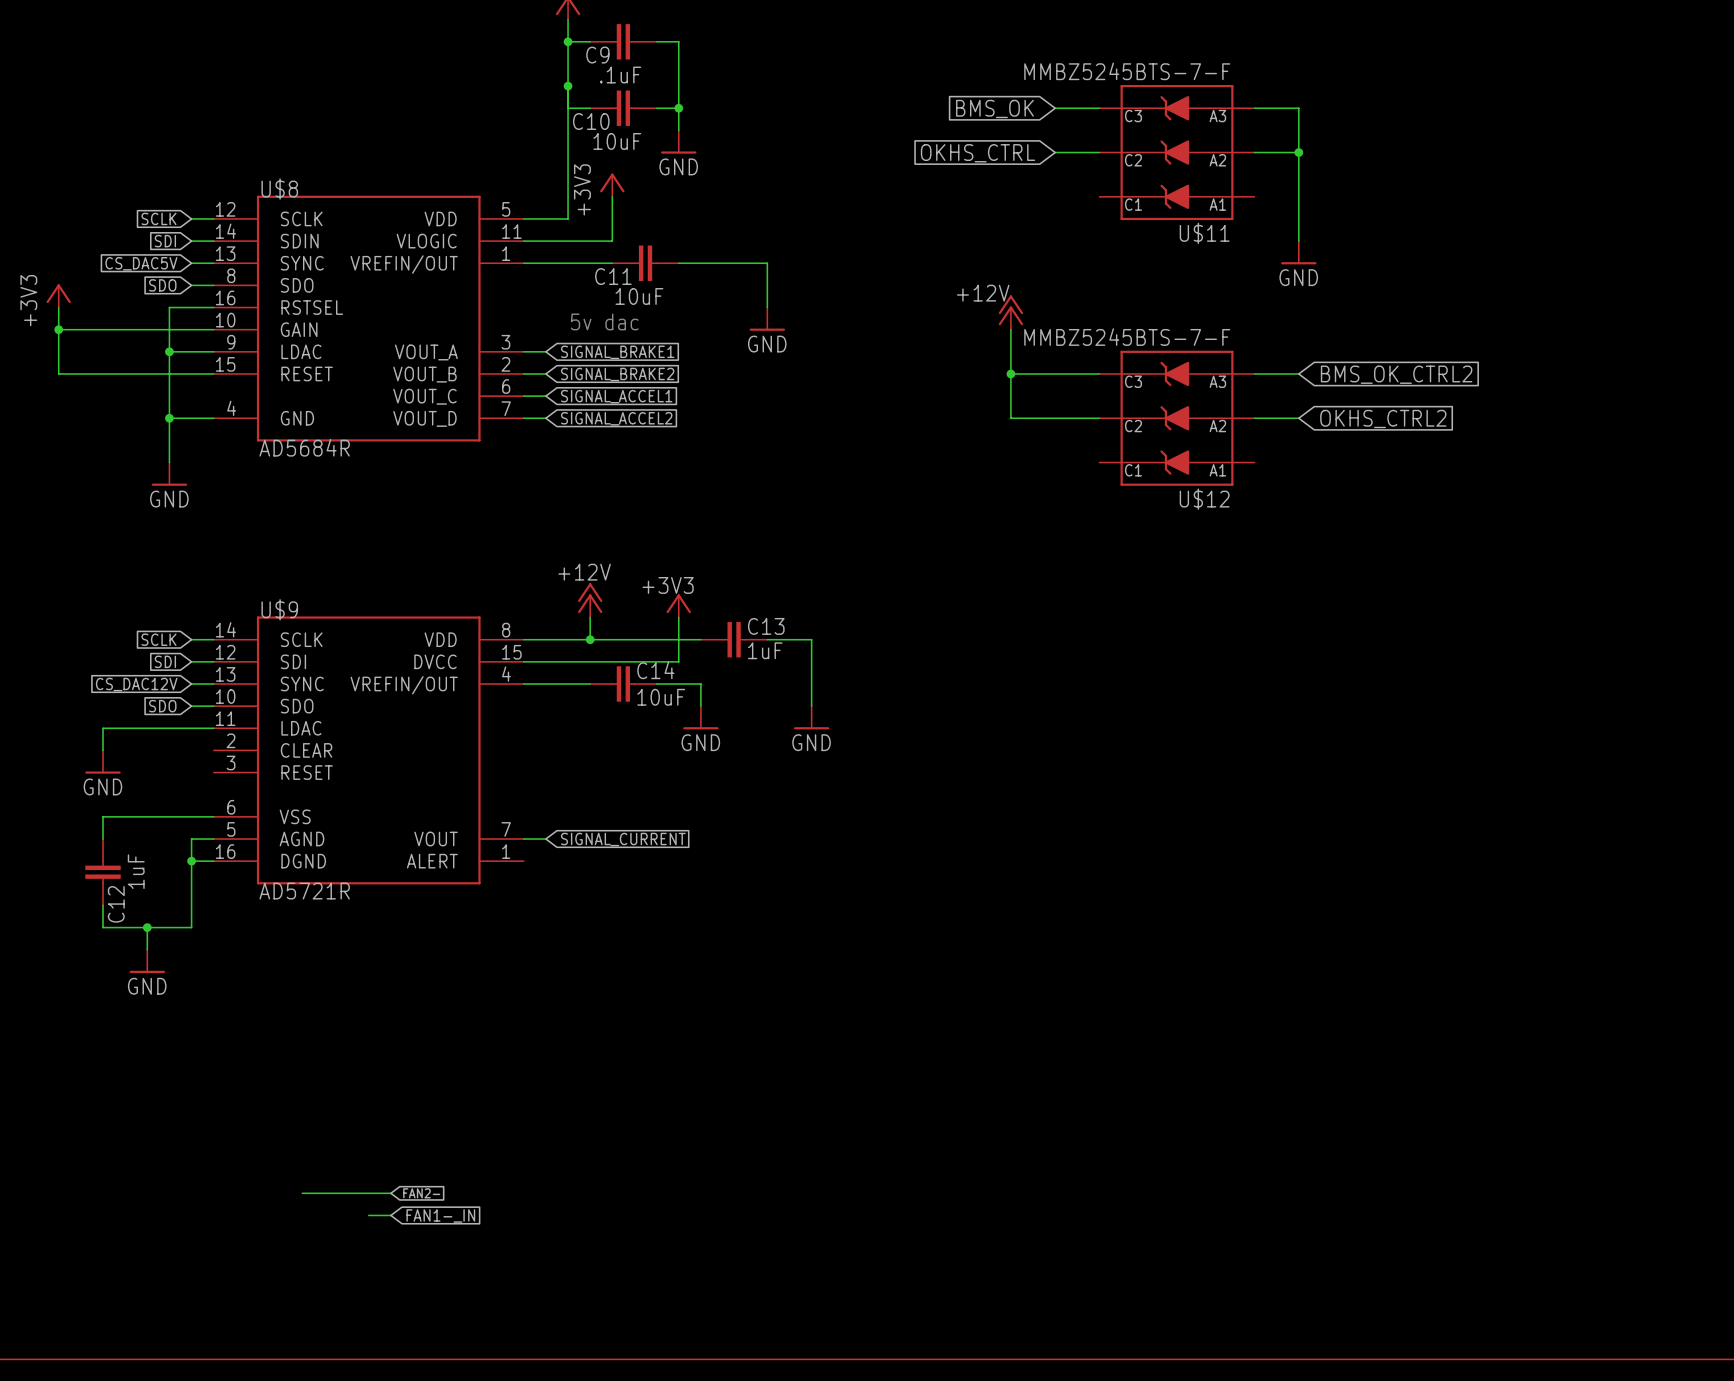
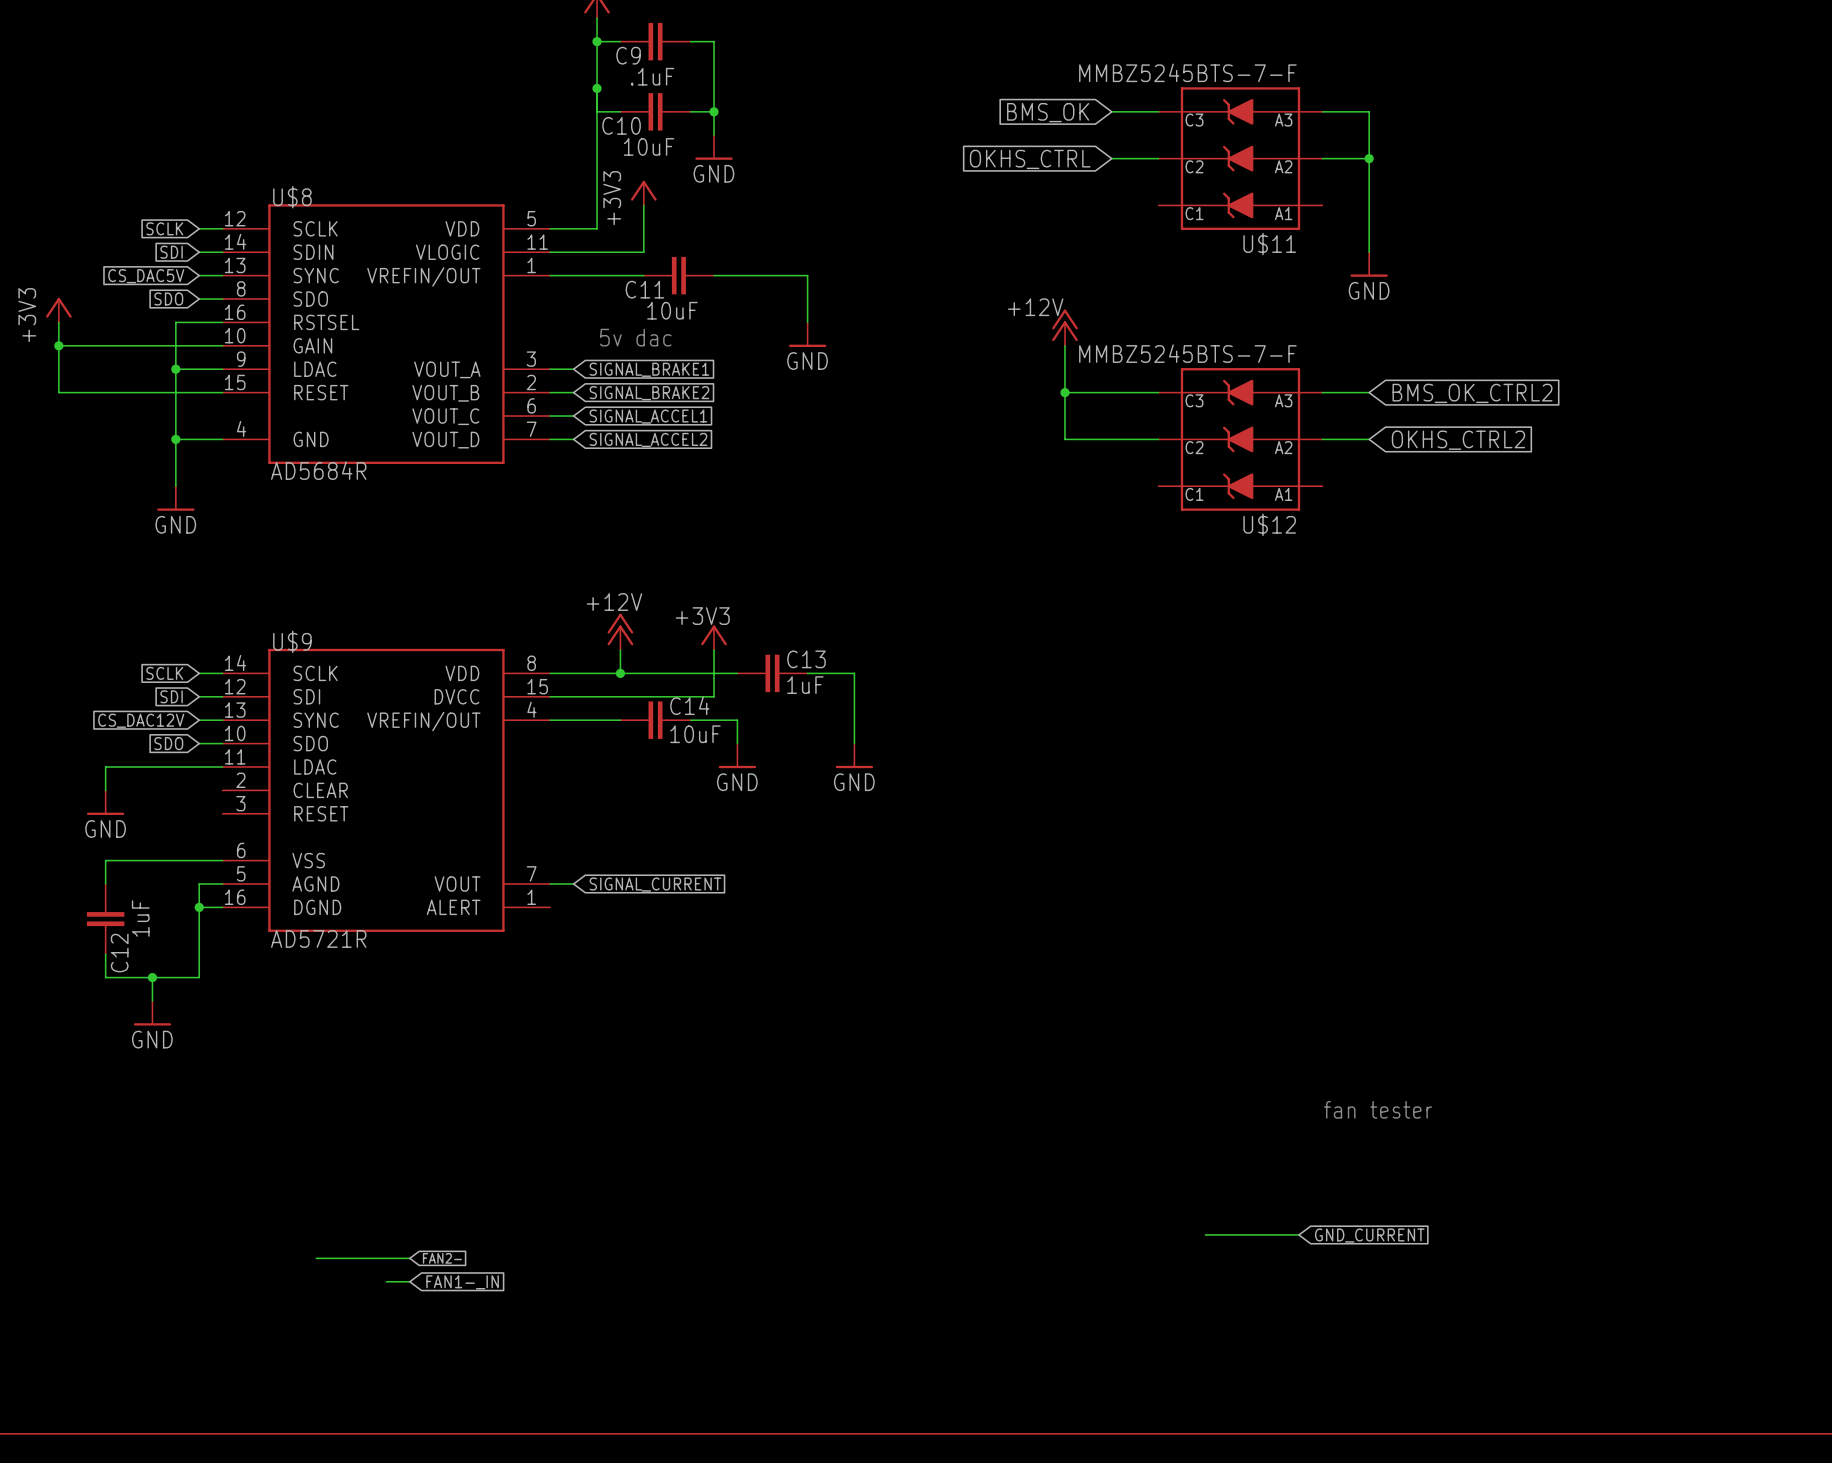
text: none -> fan tester (1377, 1109)
wire: none -> (1205, 1234) (1298, 1234)
global label: none -> GND_CURRENT (1369, 1235)

